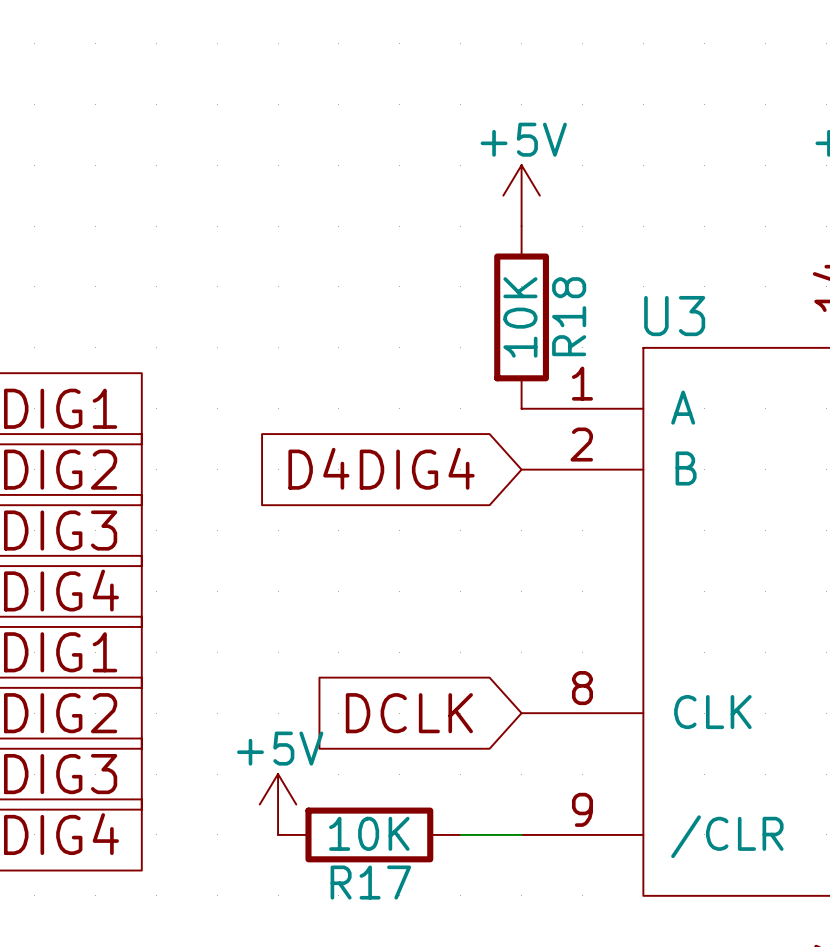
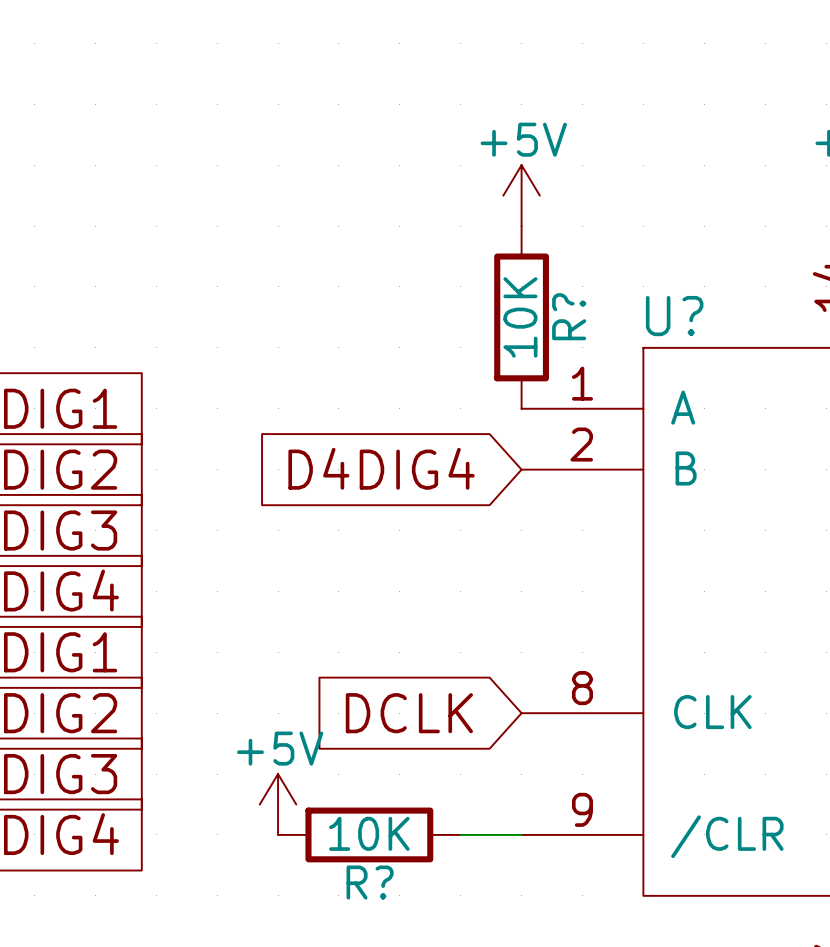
R18 name: R18 (569, 316) -> R? (569, 316)
U3 name: U3 (674, 316) -> U? (674, 316)
R17 name: R17 (370, 882) -> R? (370, 882)

